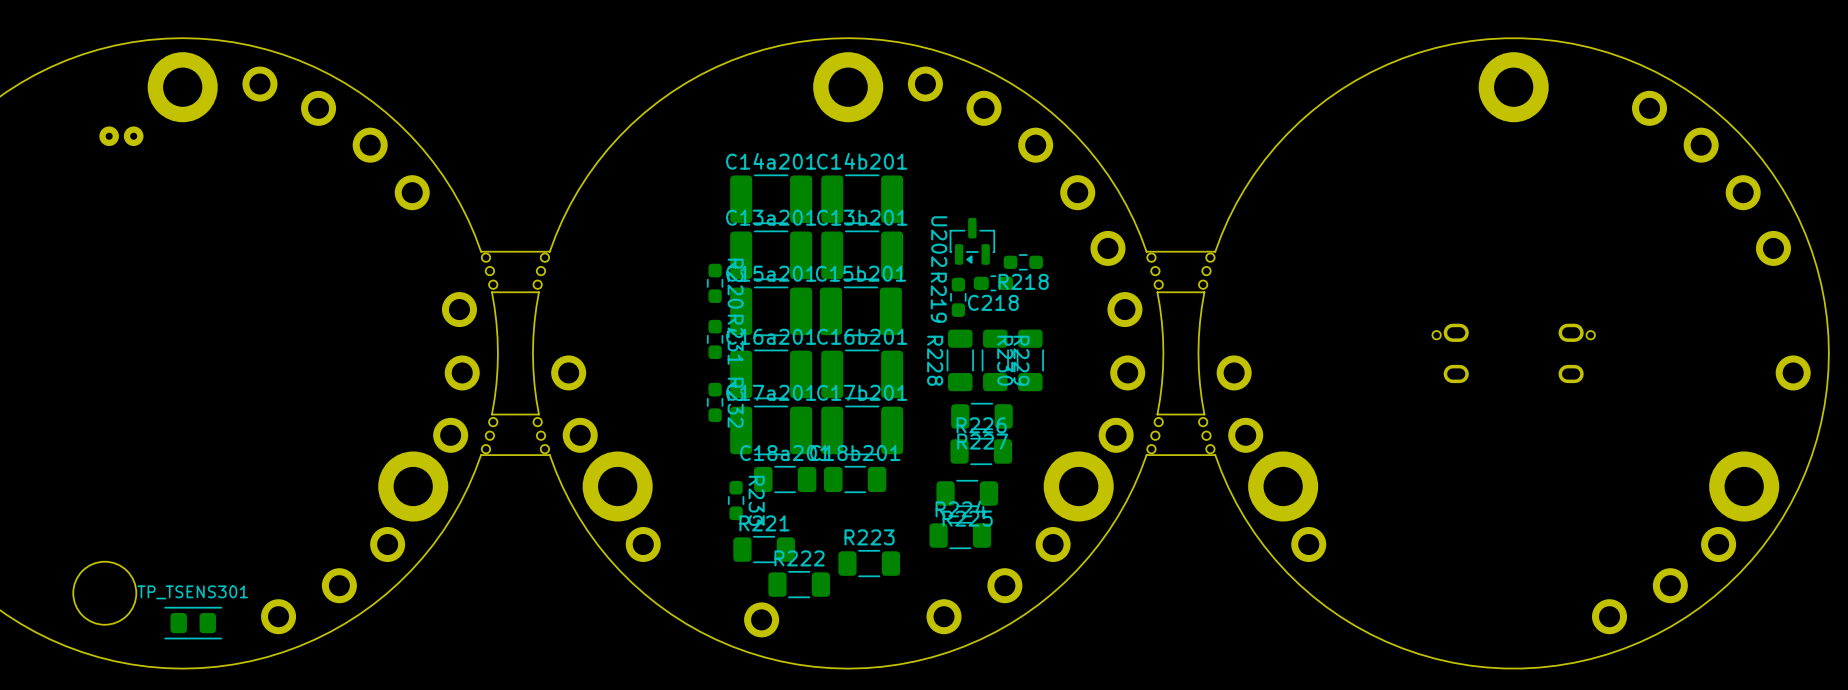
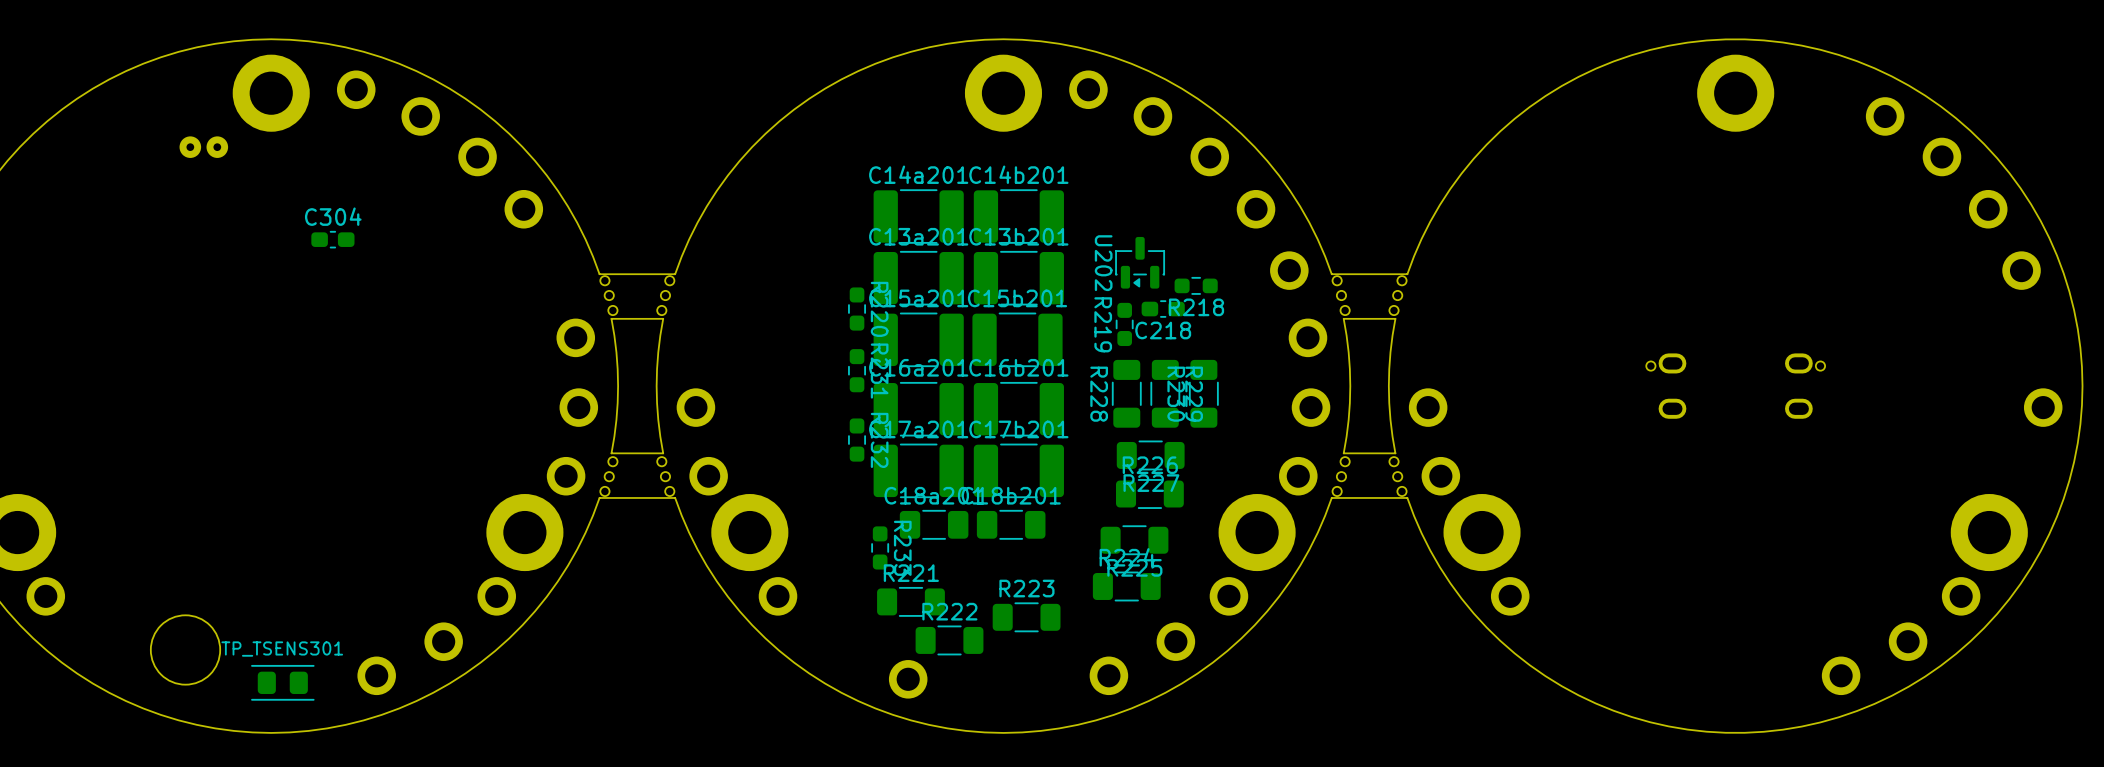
C304: none -> (332, 239)

